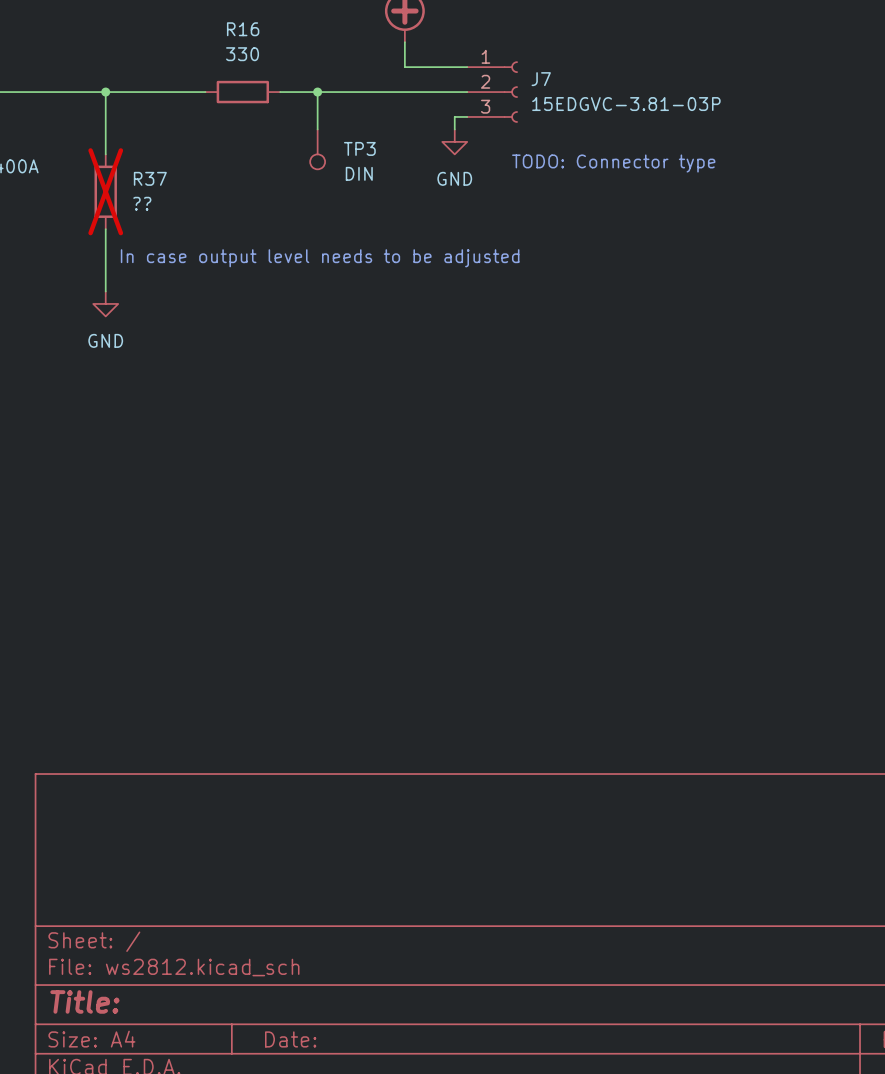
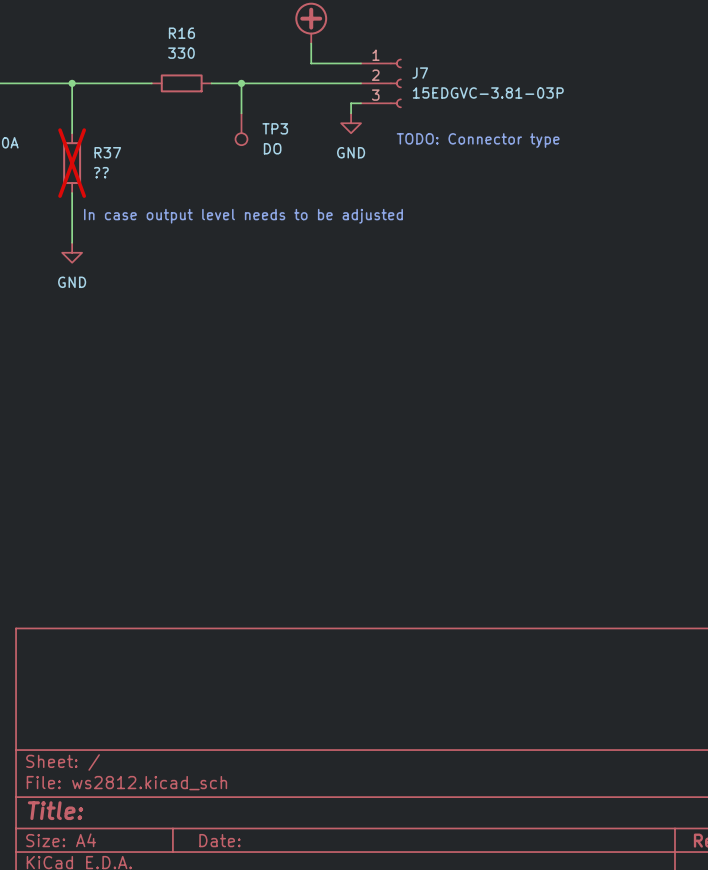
TP3 value: DIN (359, 173) -> DO (272, 148)

